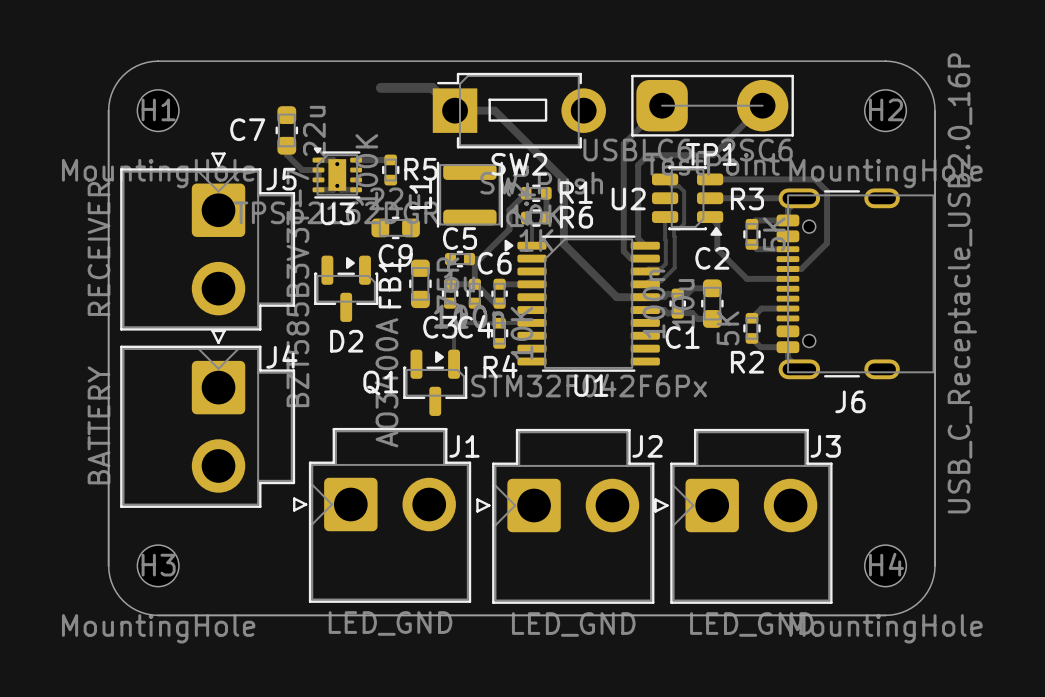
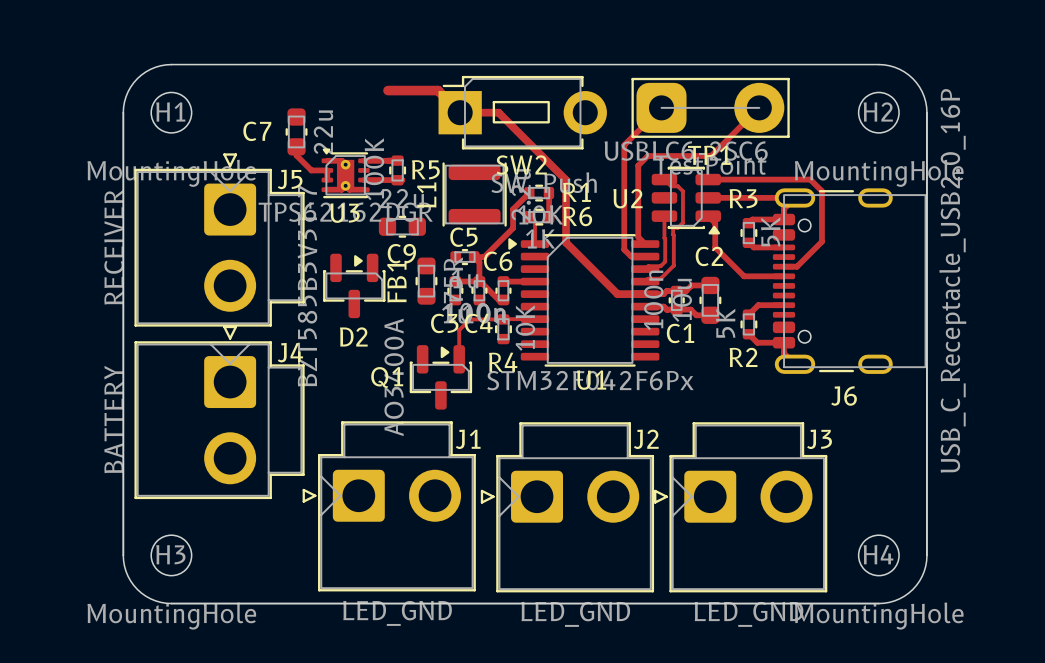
track: none -> (363, 180) (402, 180)

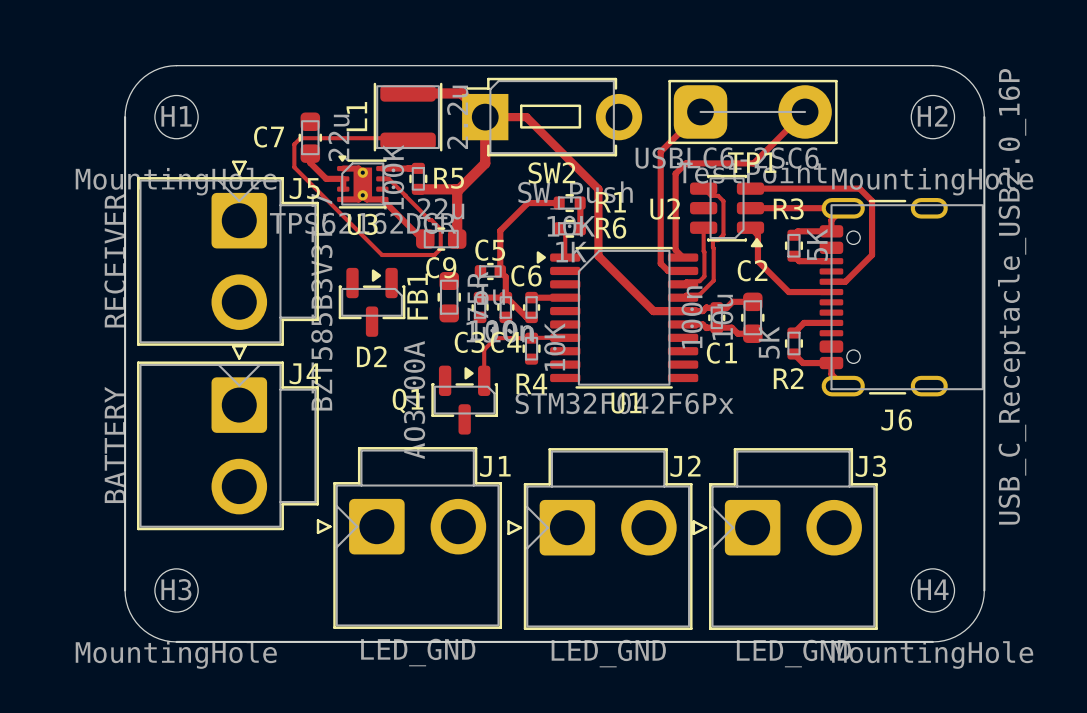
track: none -> (485, 117) (485, 163) (457, 191)
track: none -> (408, 140) (405, 138) (300, 138) (294, 144) (294, 167) (382, 255) (434, 255) (440, 248) (440, 229) (405, 195)
track: none -> (382, 178) (388, 178) (405, 195)
track: (363, 180) (402, 180) -> none
track: none -> (418, 189) (455, 189) (457, 191)
track: none -> (457, 191) (457, 239)
track: none -> (382, 199) (421, 239) (425, 239)
track: (529, 193) (513, 209) (513, 228) (484, 257) (474, 257) -> (559, 203) (527, 203) (500, 230) (500, 271)
L1 position: (474, 194) -> (408, 117)
C9 position: (402, 226) -> (441, 239)

